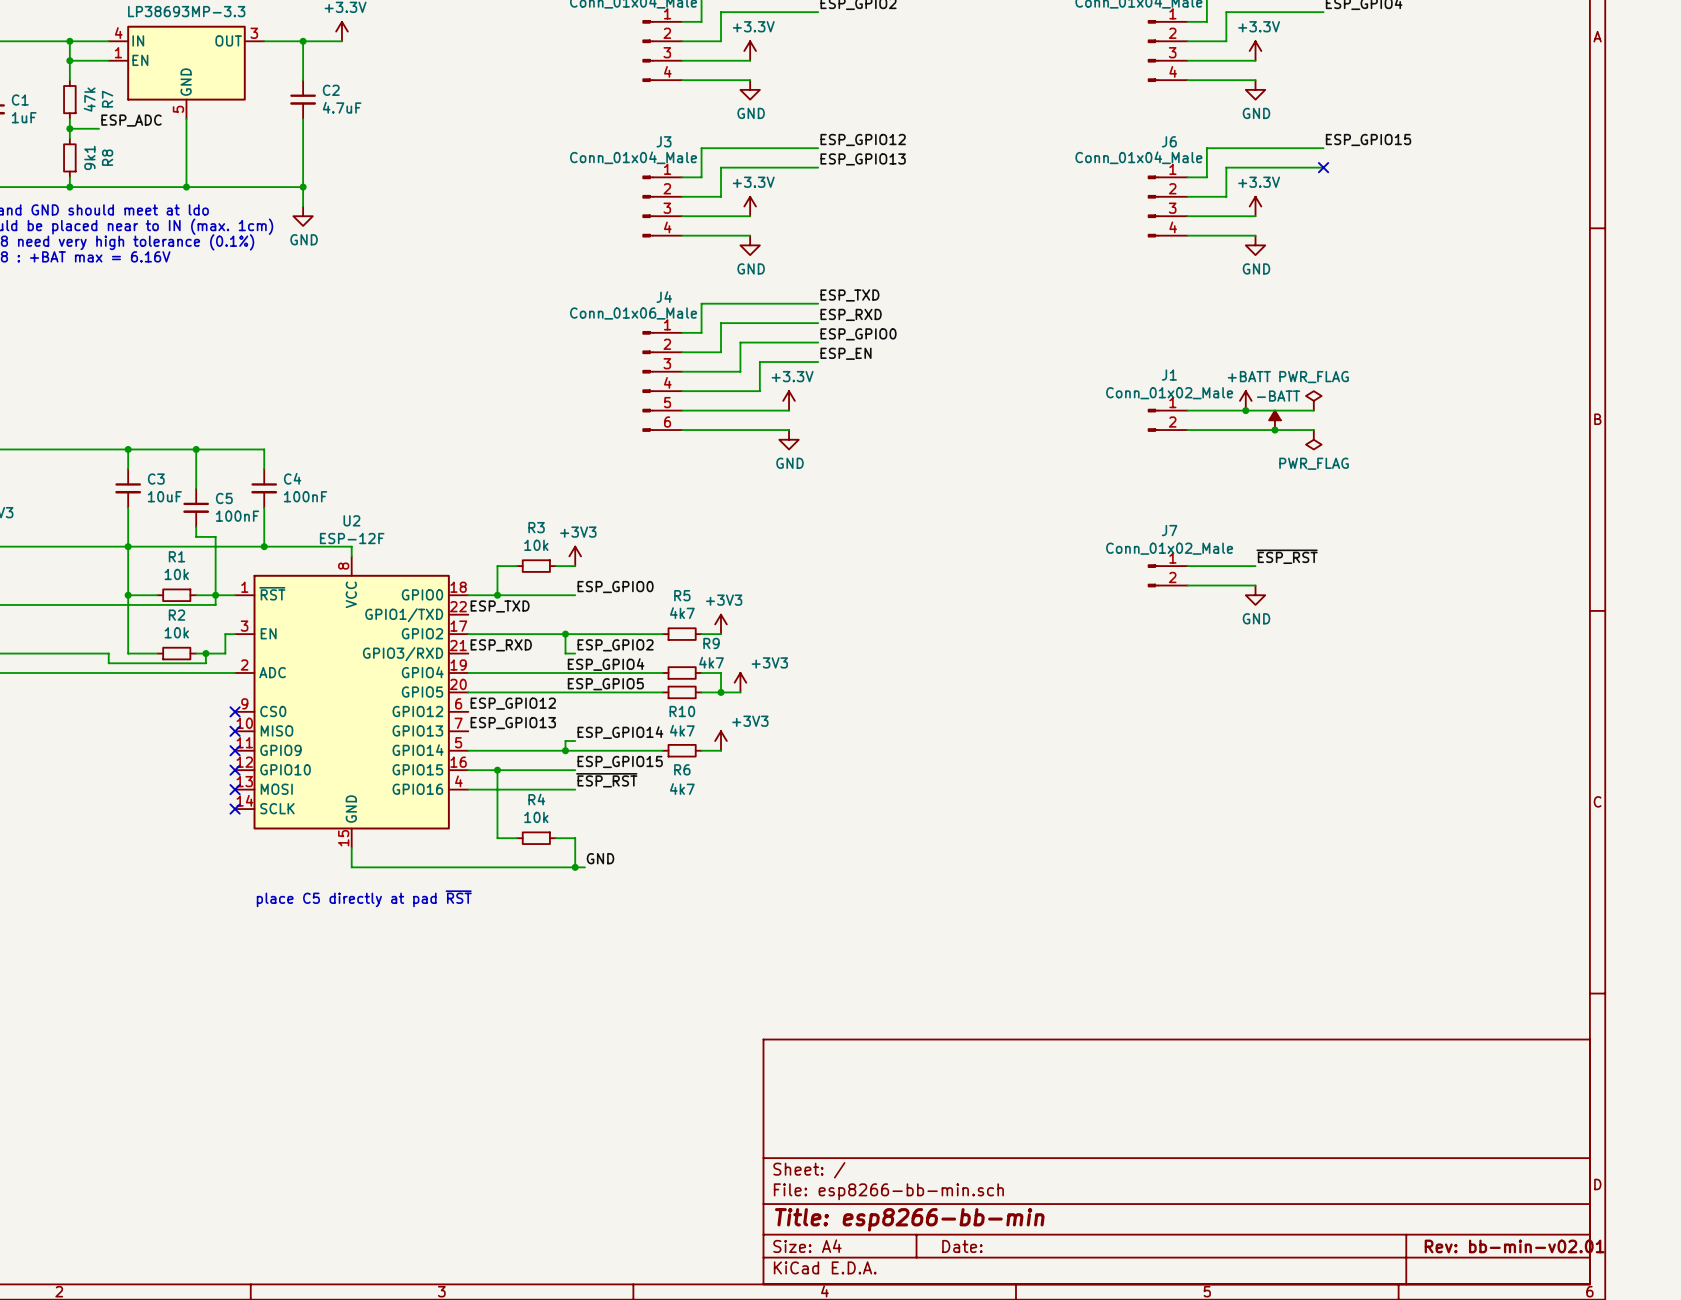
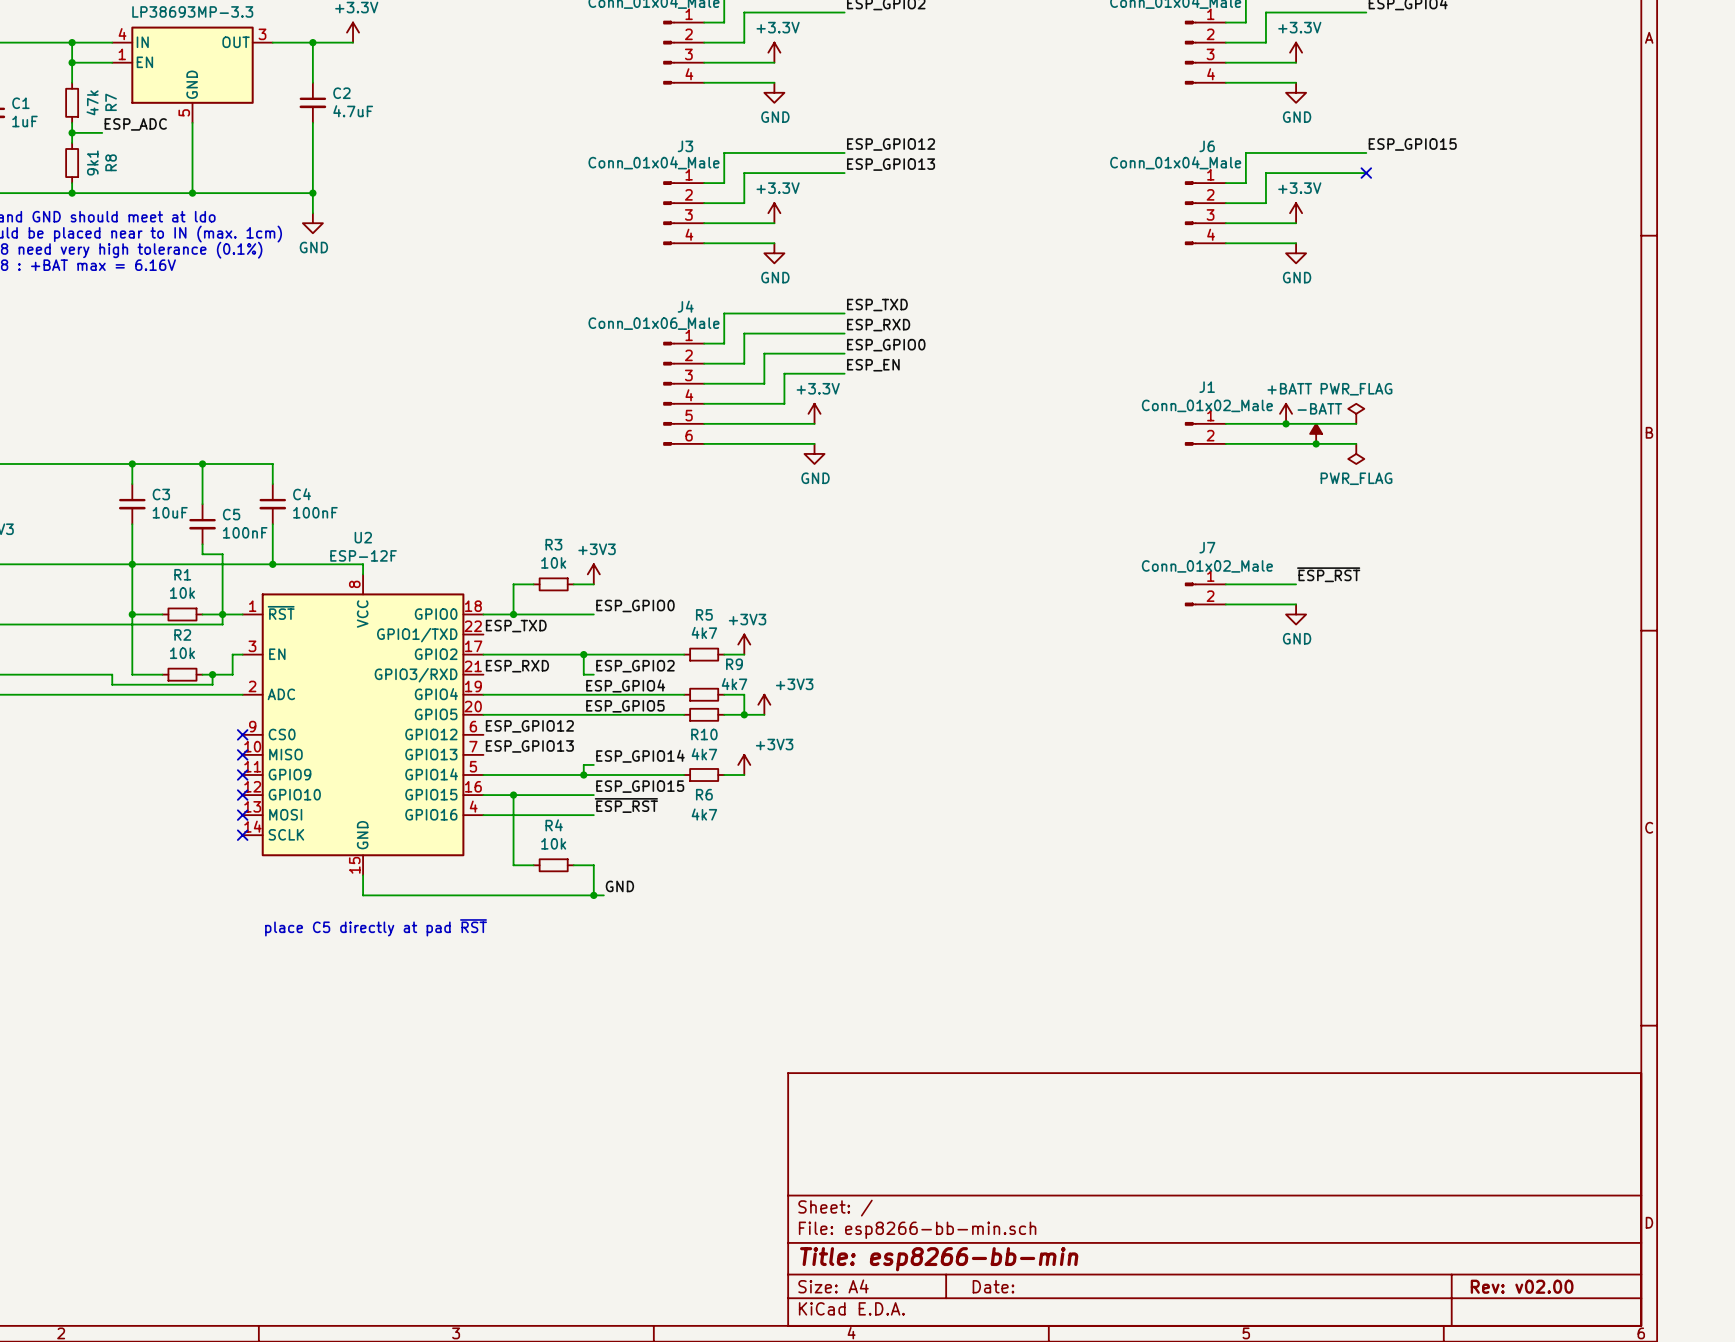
title block: Rev: bb-min-v02.01 (1514, 1246) -> Rev: v02.00 (1522, 1286)

